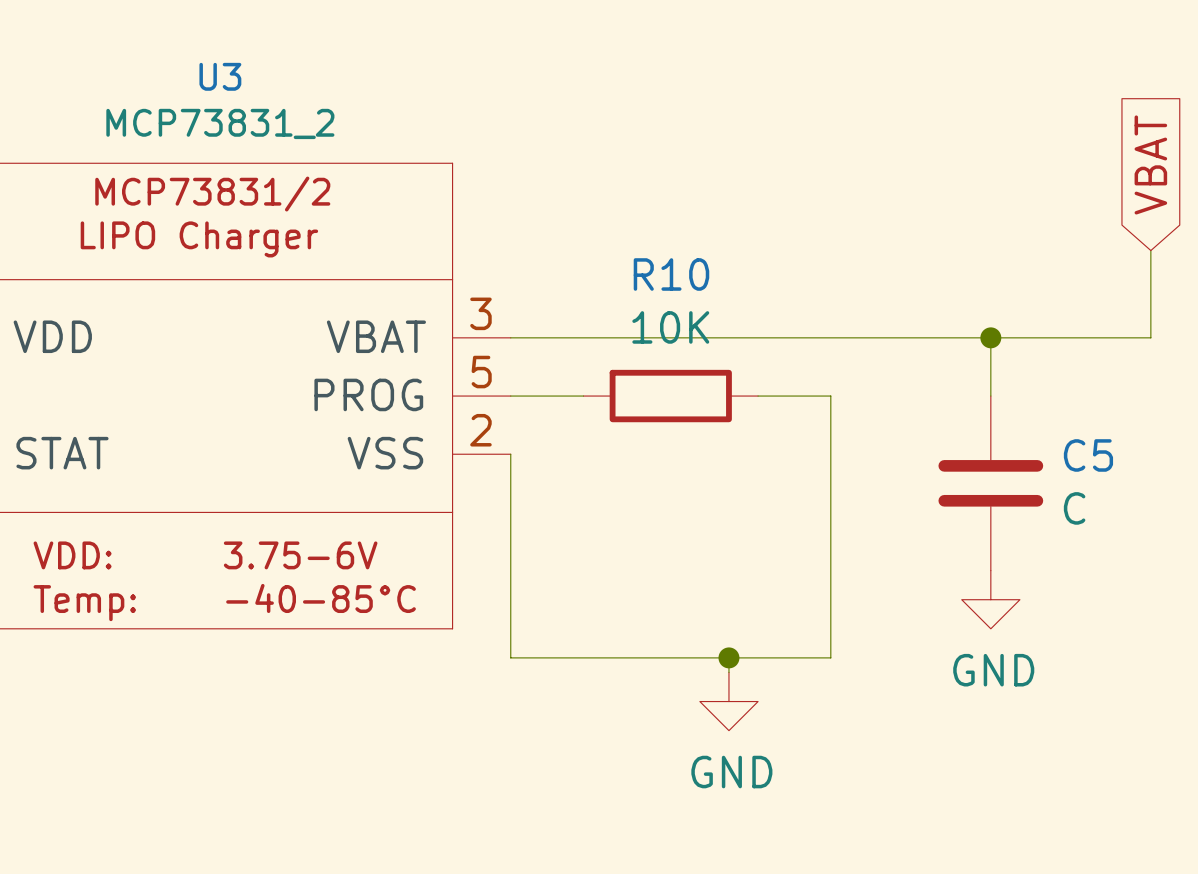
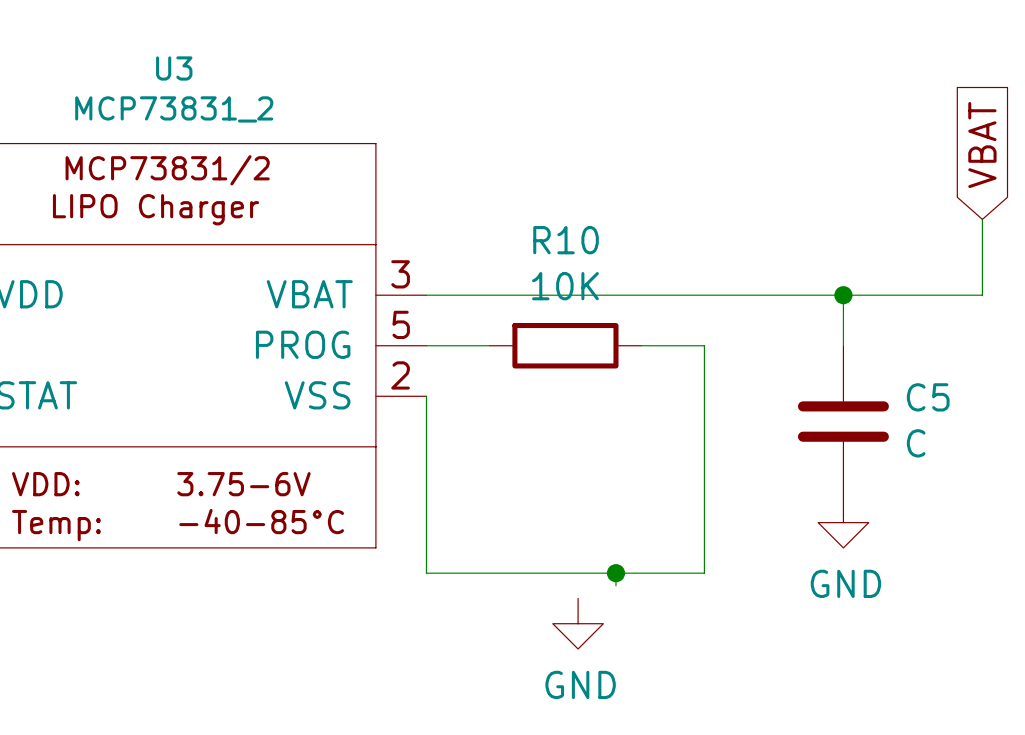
power symbol position: GND (728, 701) -> GND (578, 623)

